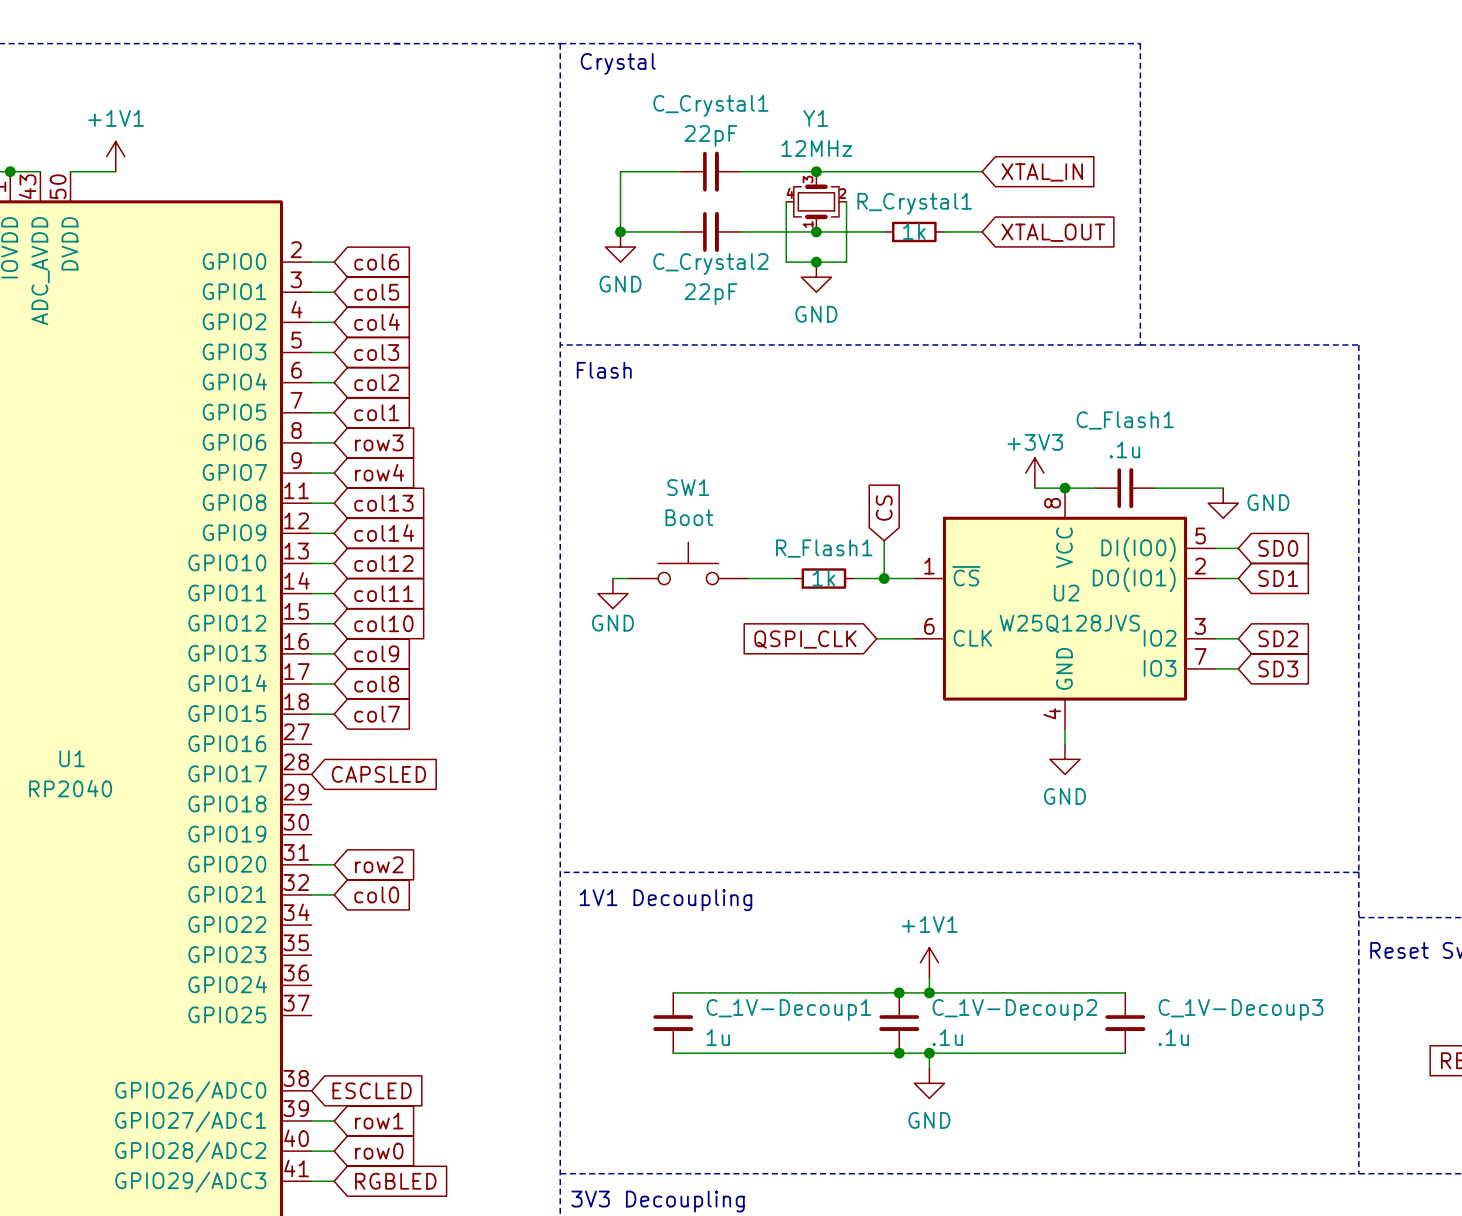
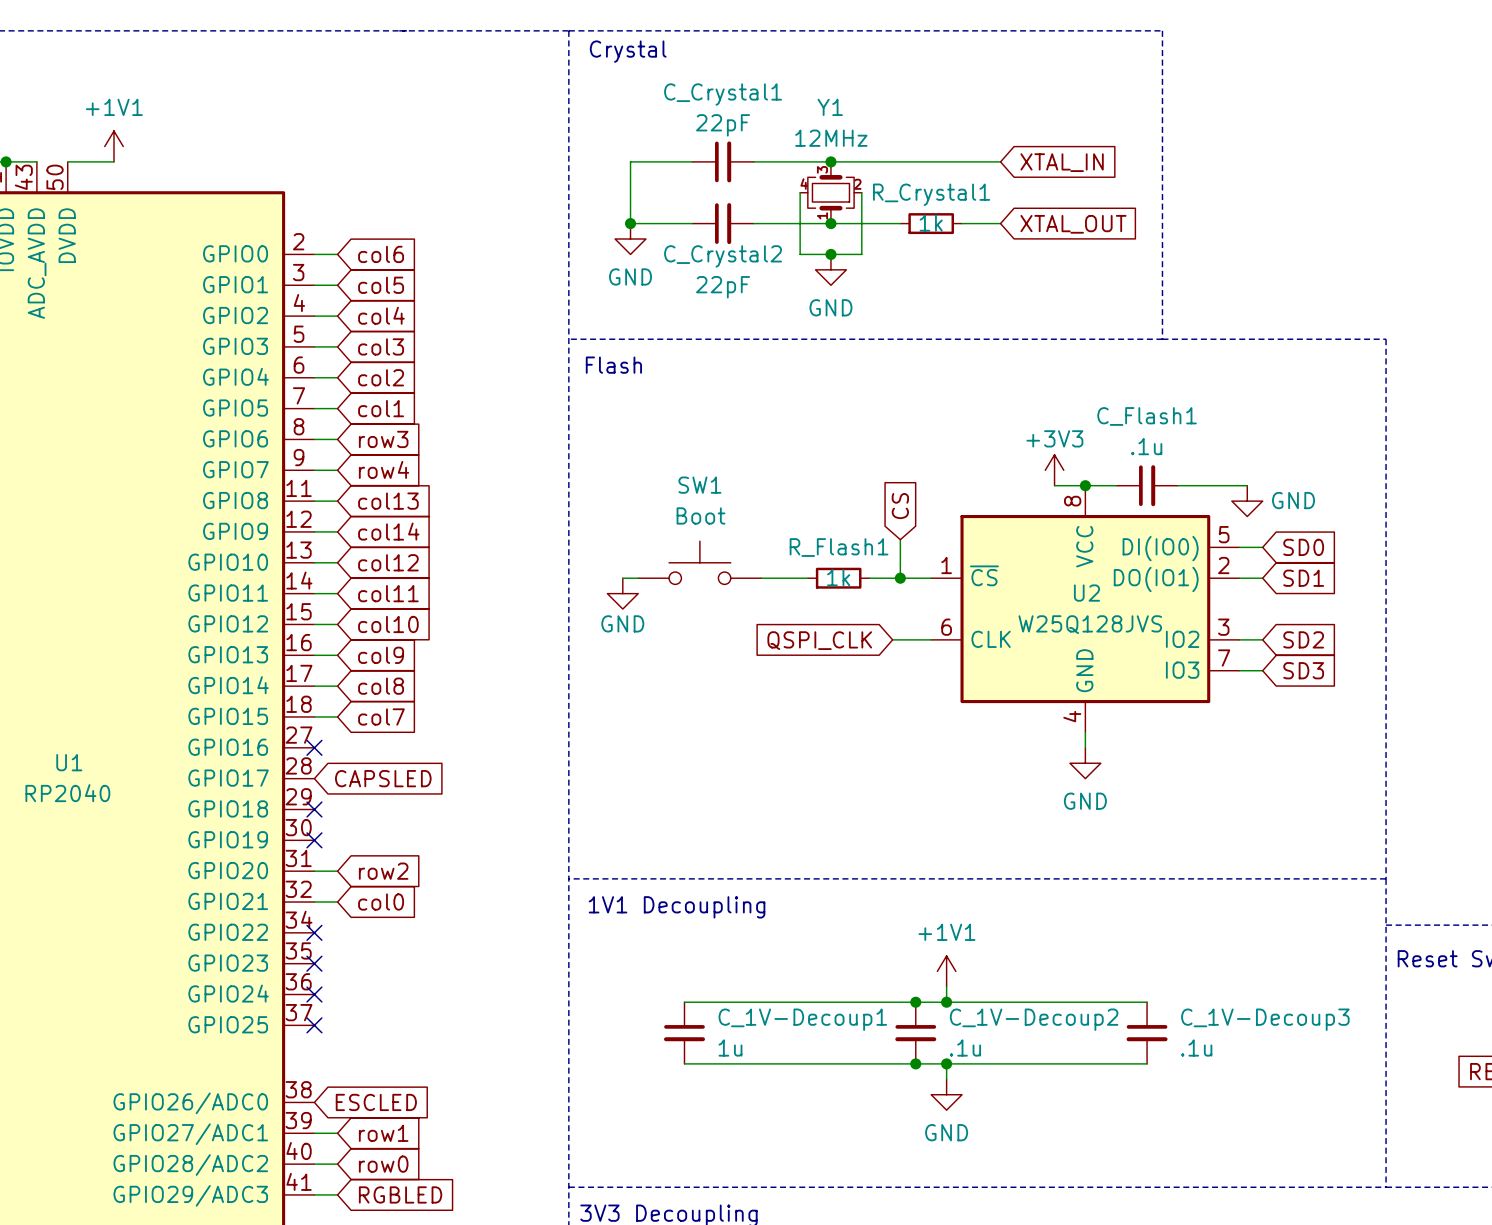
no-connect mark: none -> (314, 747)
no-connect mark: none -> (314, 809)
no-connect mark: none -> (314, 840)
no-connect mark: none -> (314, 932)
no-connect mark: none -> (314, 963)
no-connect mark: none -> (314, 994)
no-connect mark: none -> (314, 1025)

